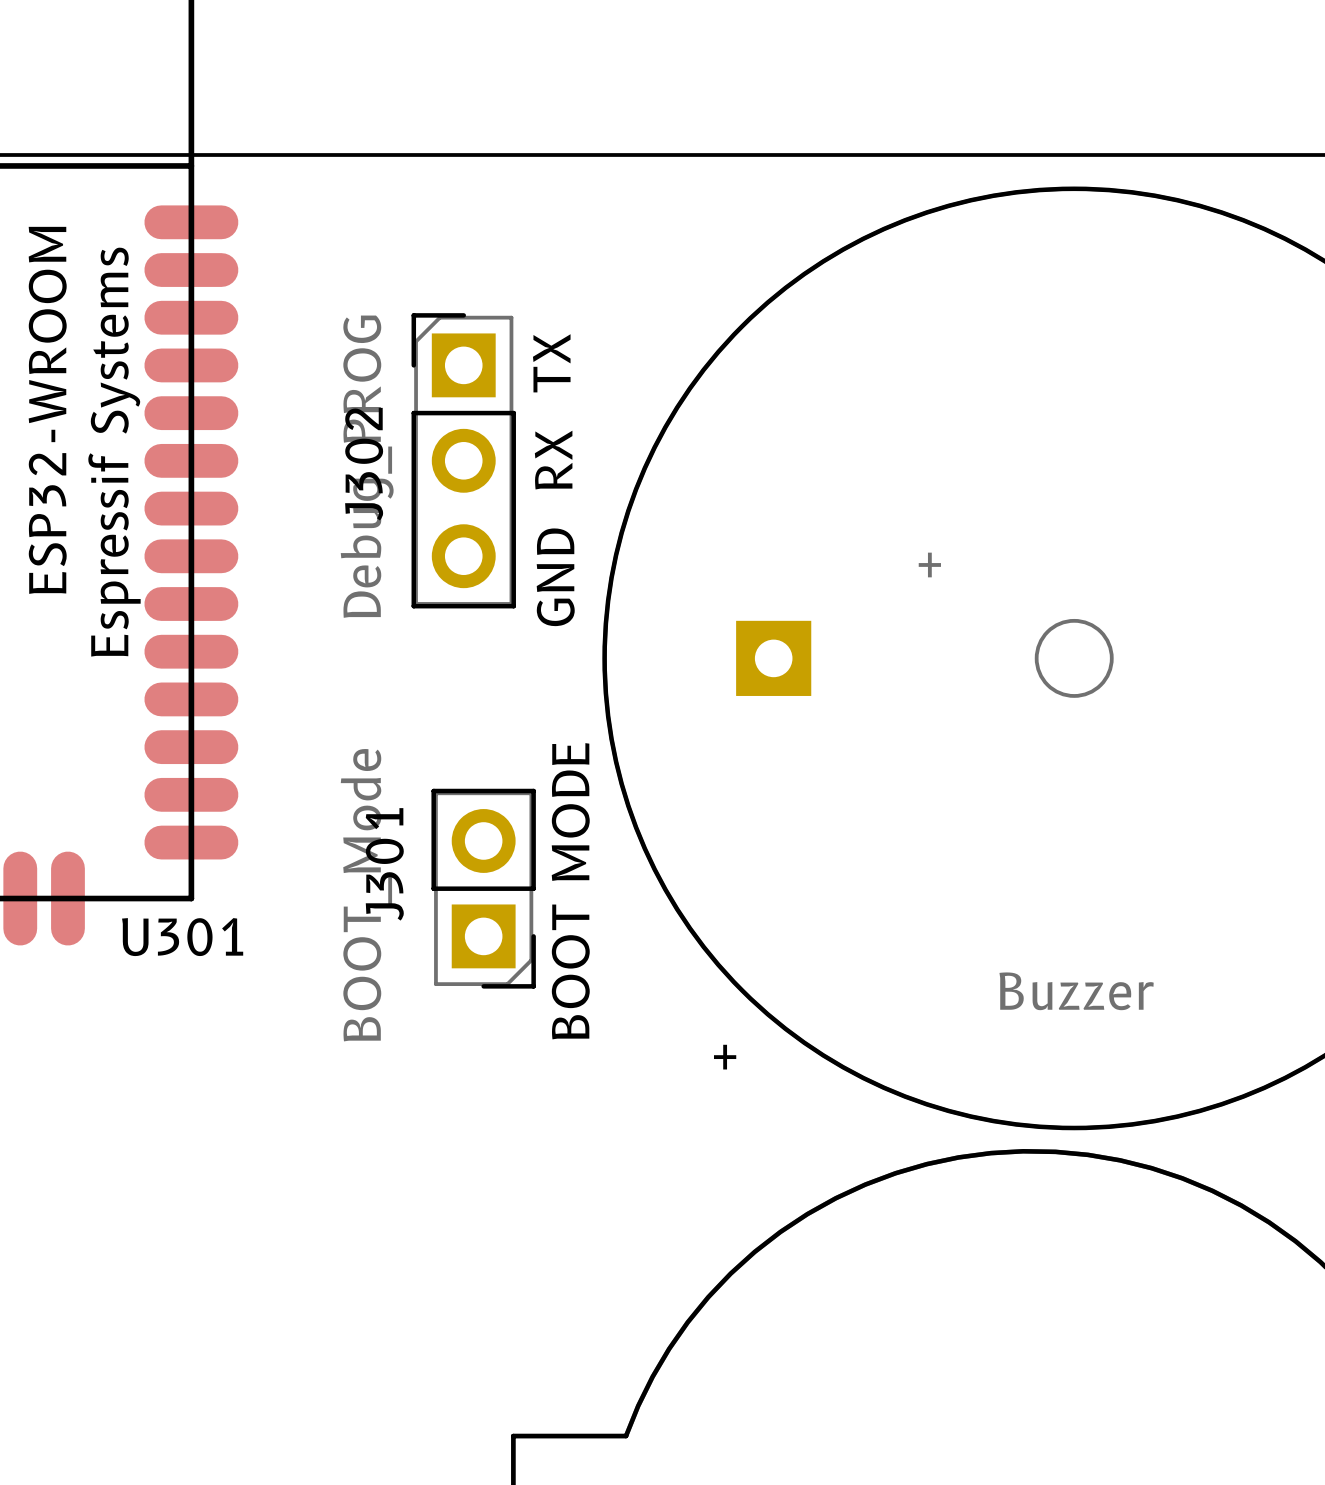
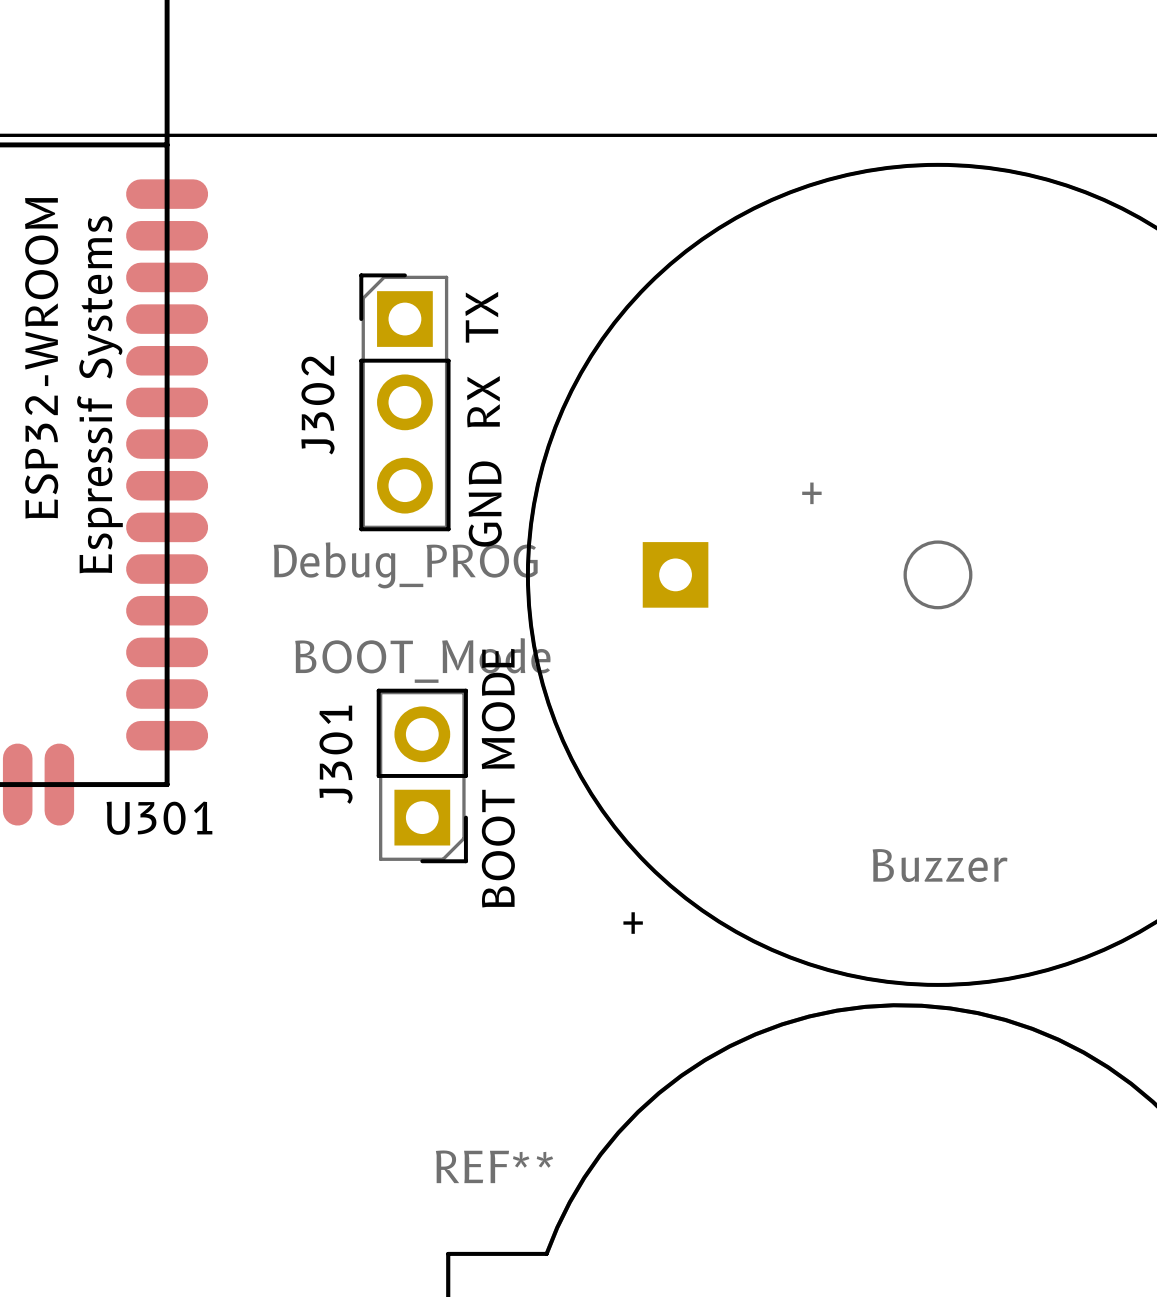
J302 value rotation: 0° (367, 466) -> 90° clockwise (405, 565)
J301 value rotation: 0° (366, 895) -> 90° clockwise (422, 660)
part text: none -> REF** (494, 1166)

